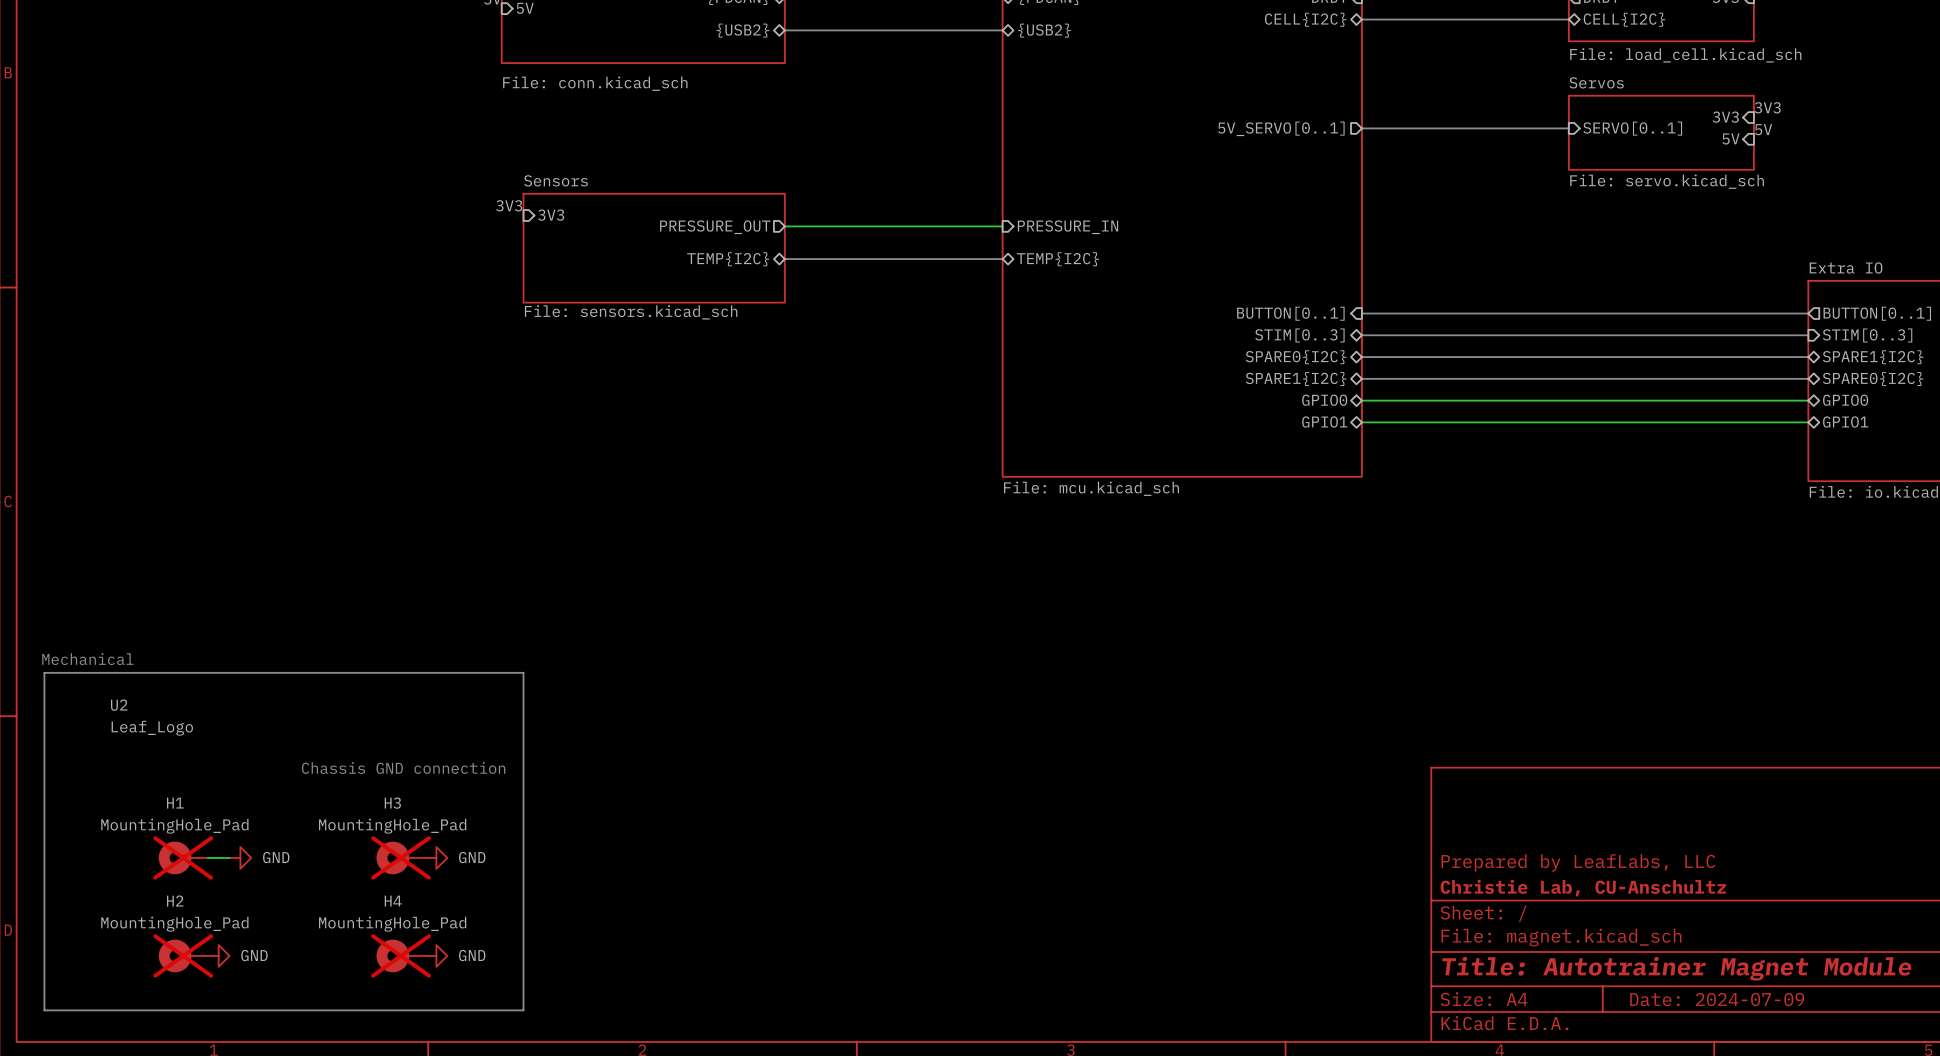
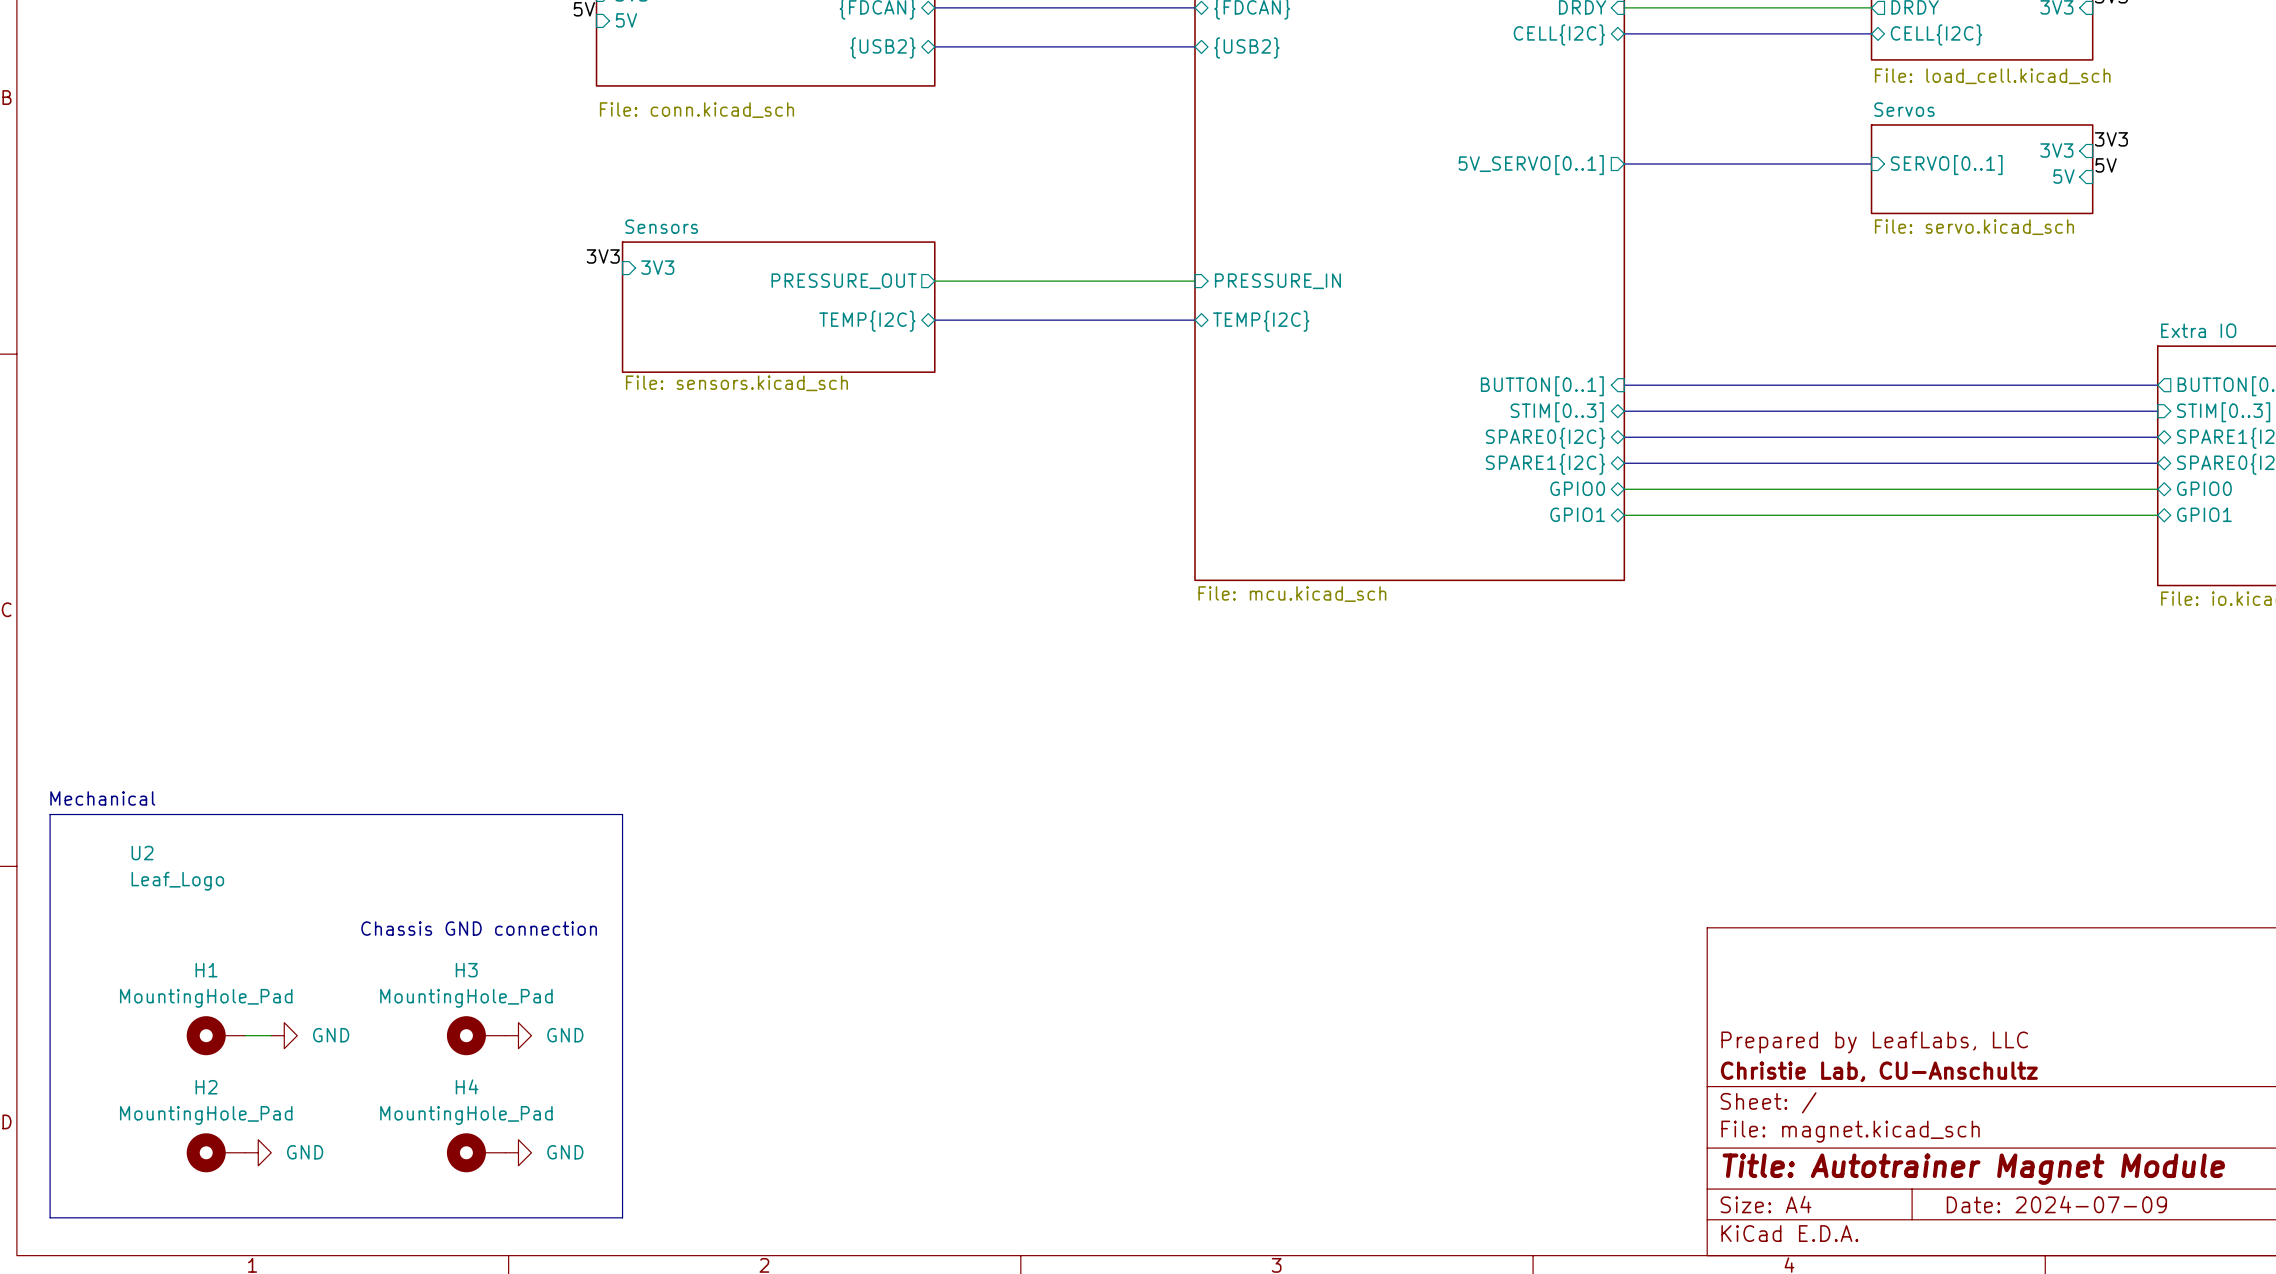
H1 do-not-place cross: (183, 857) -> none
H3 do-not-place cross: (401, 857) -> none
H2 do-not-place cross: (183, 955) -> none
H4 do-not-place cross: (401, 955) -> none

